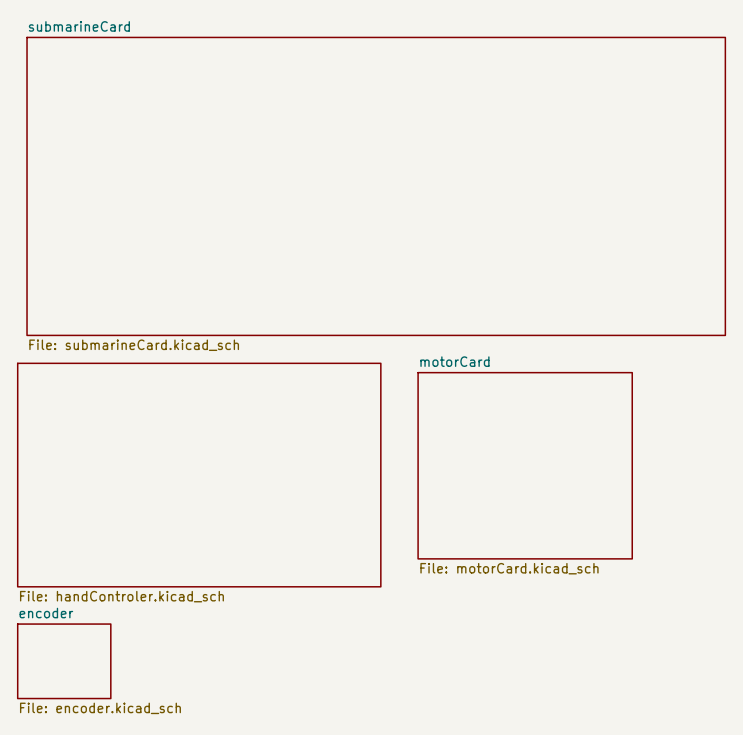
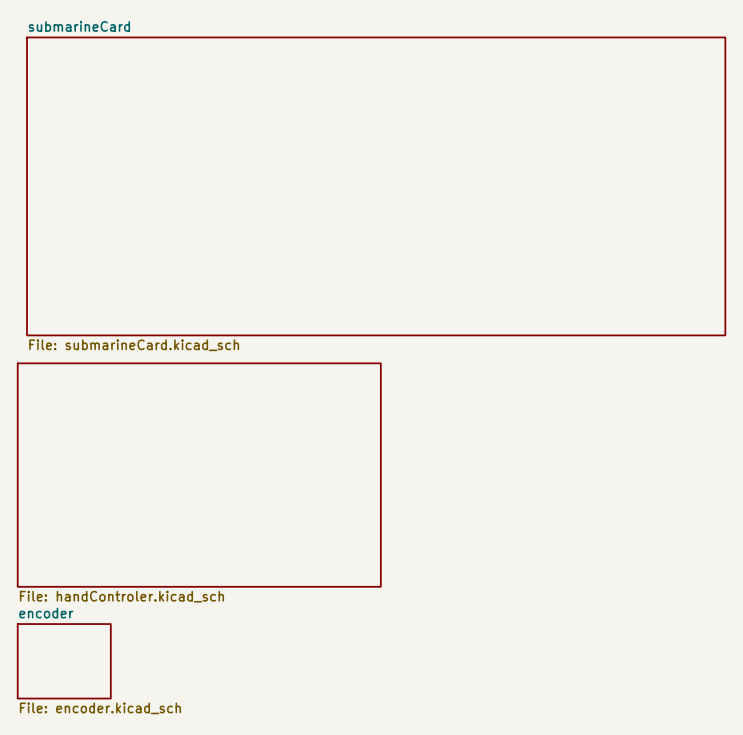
sheet motorCard: File: motorCard.kicad_sch (525, 465) -> none

